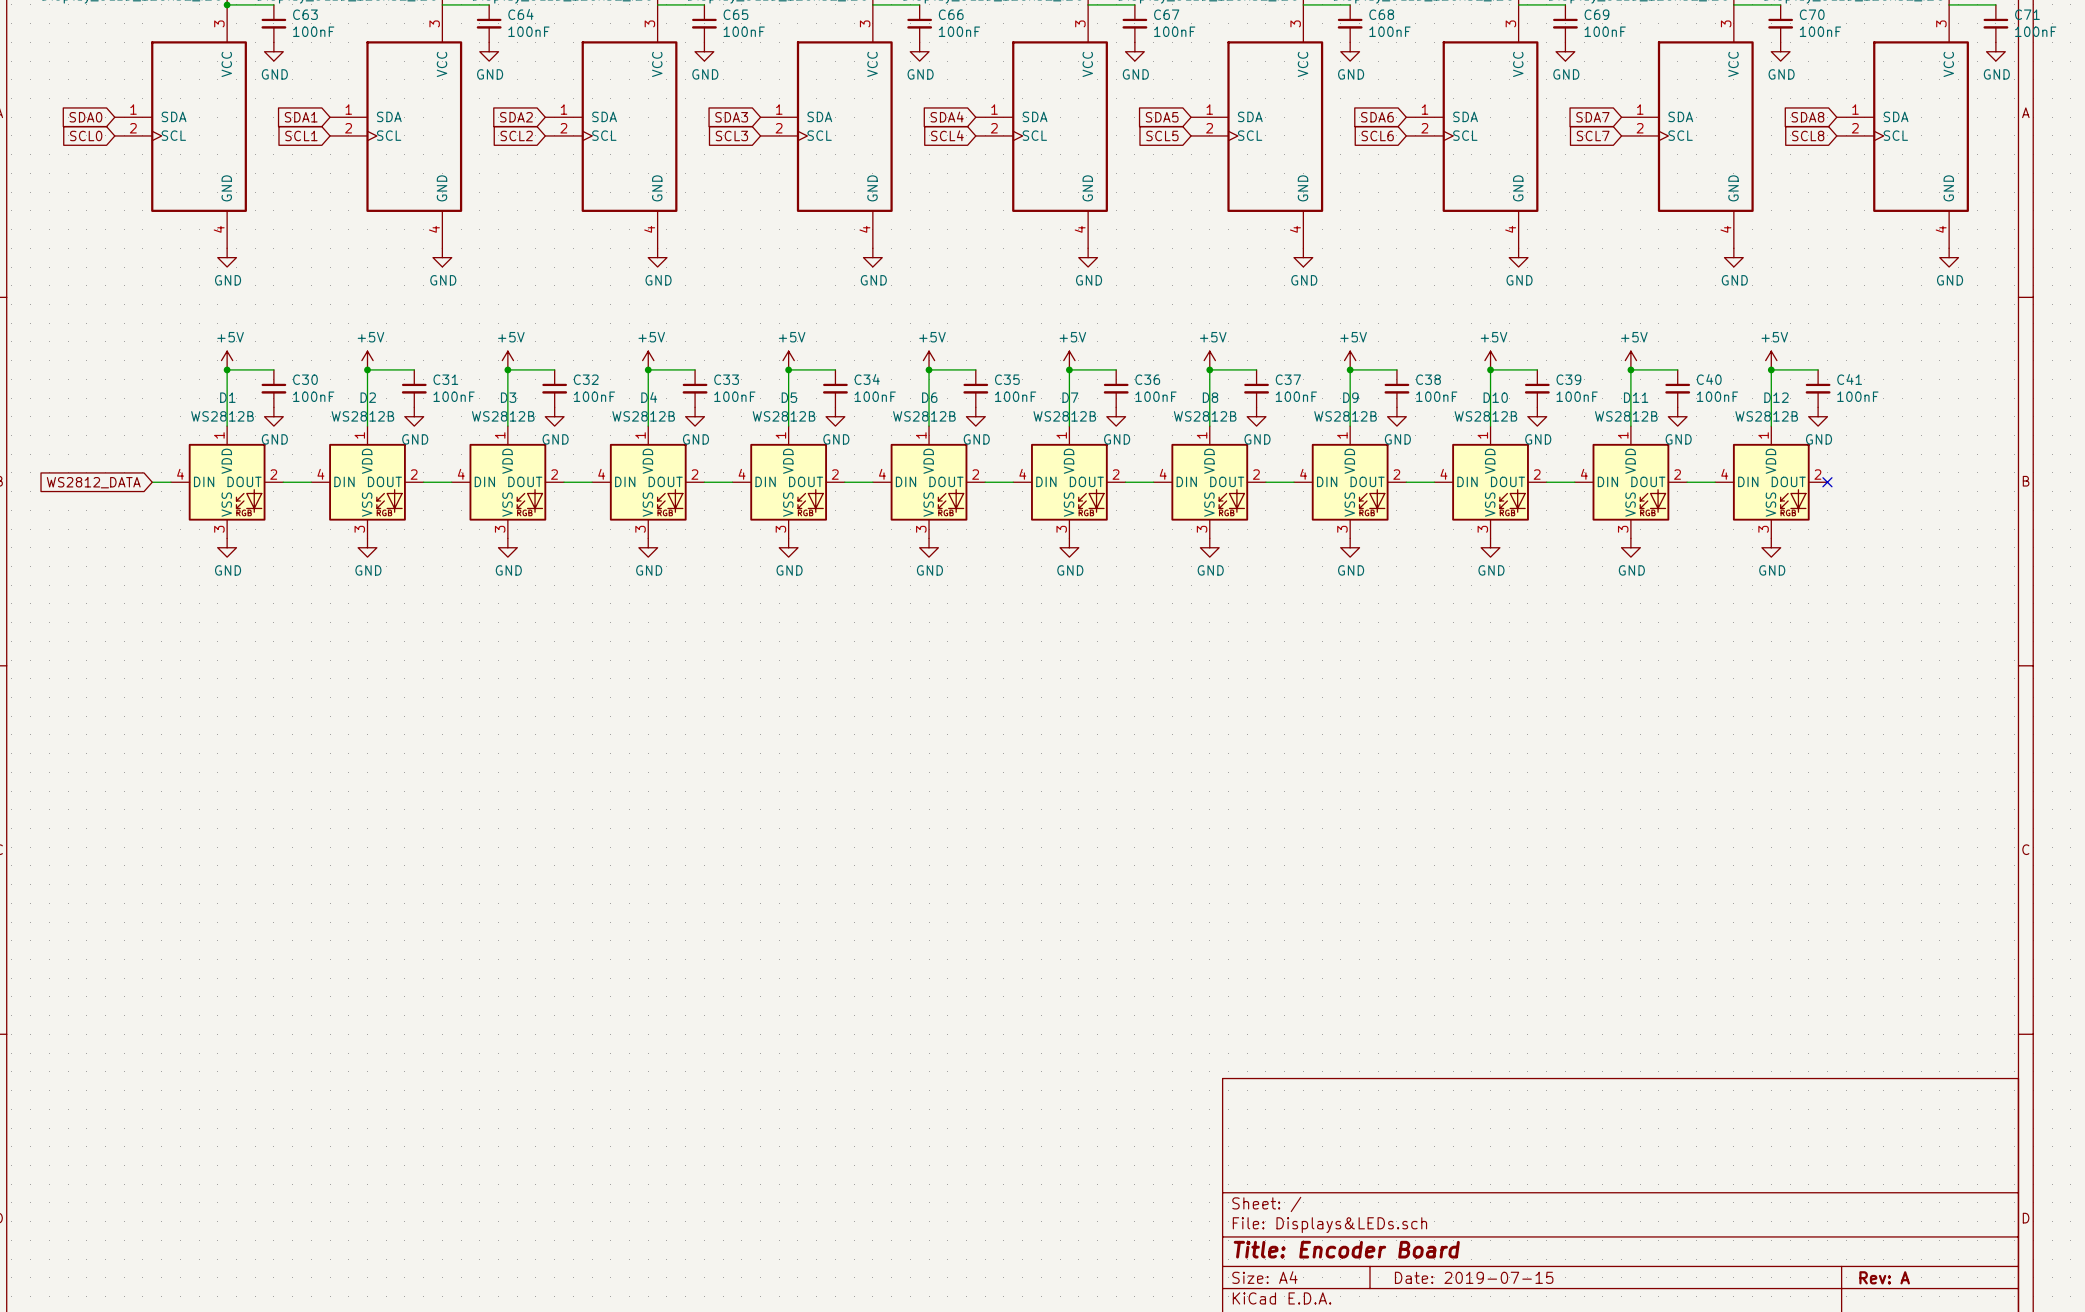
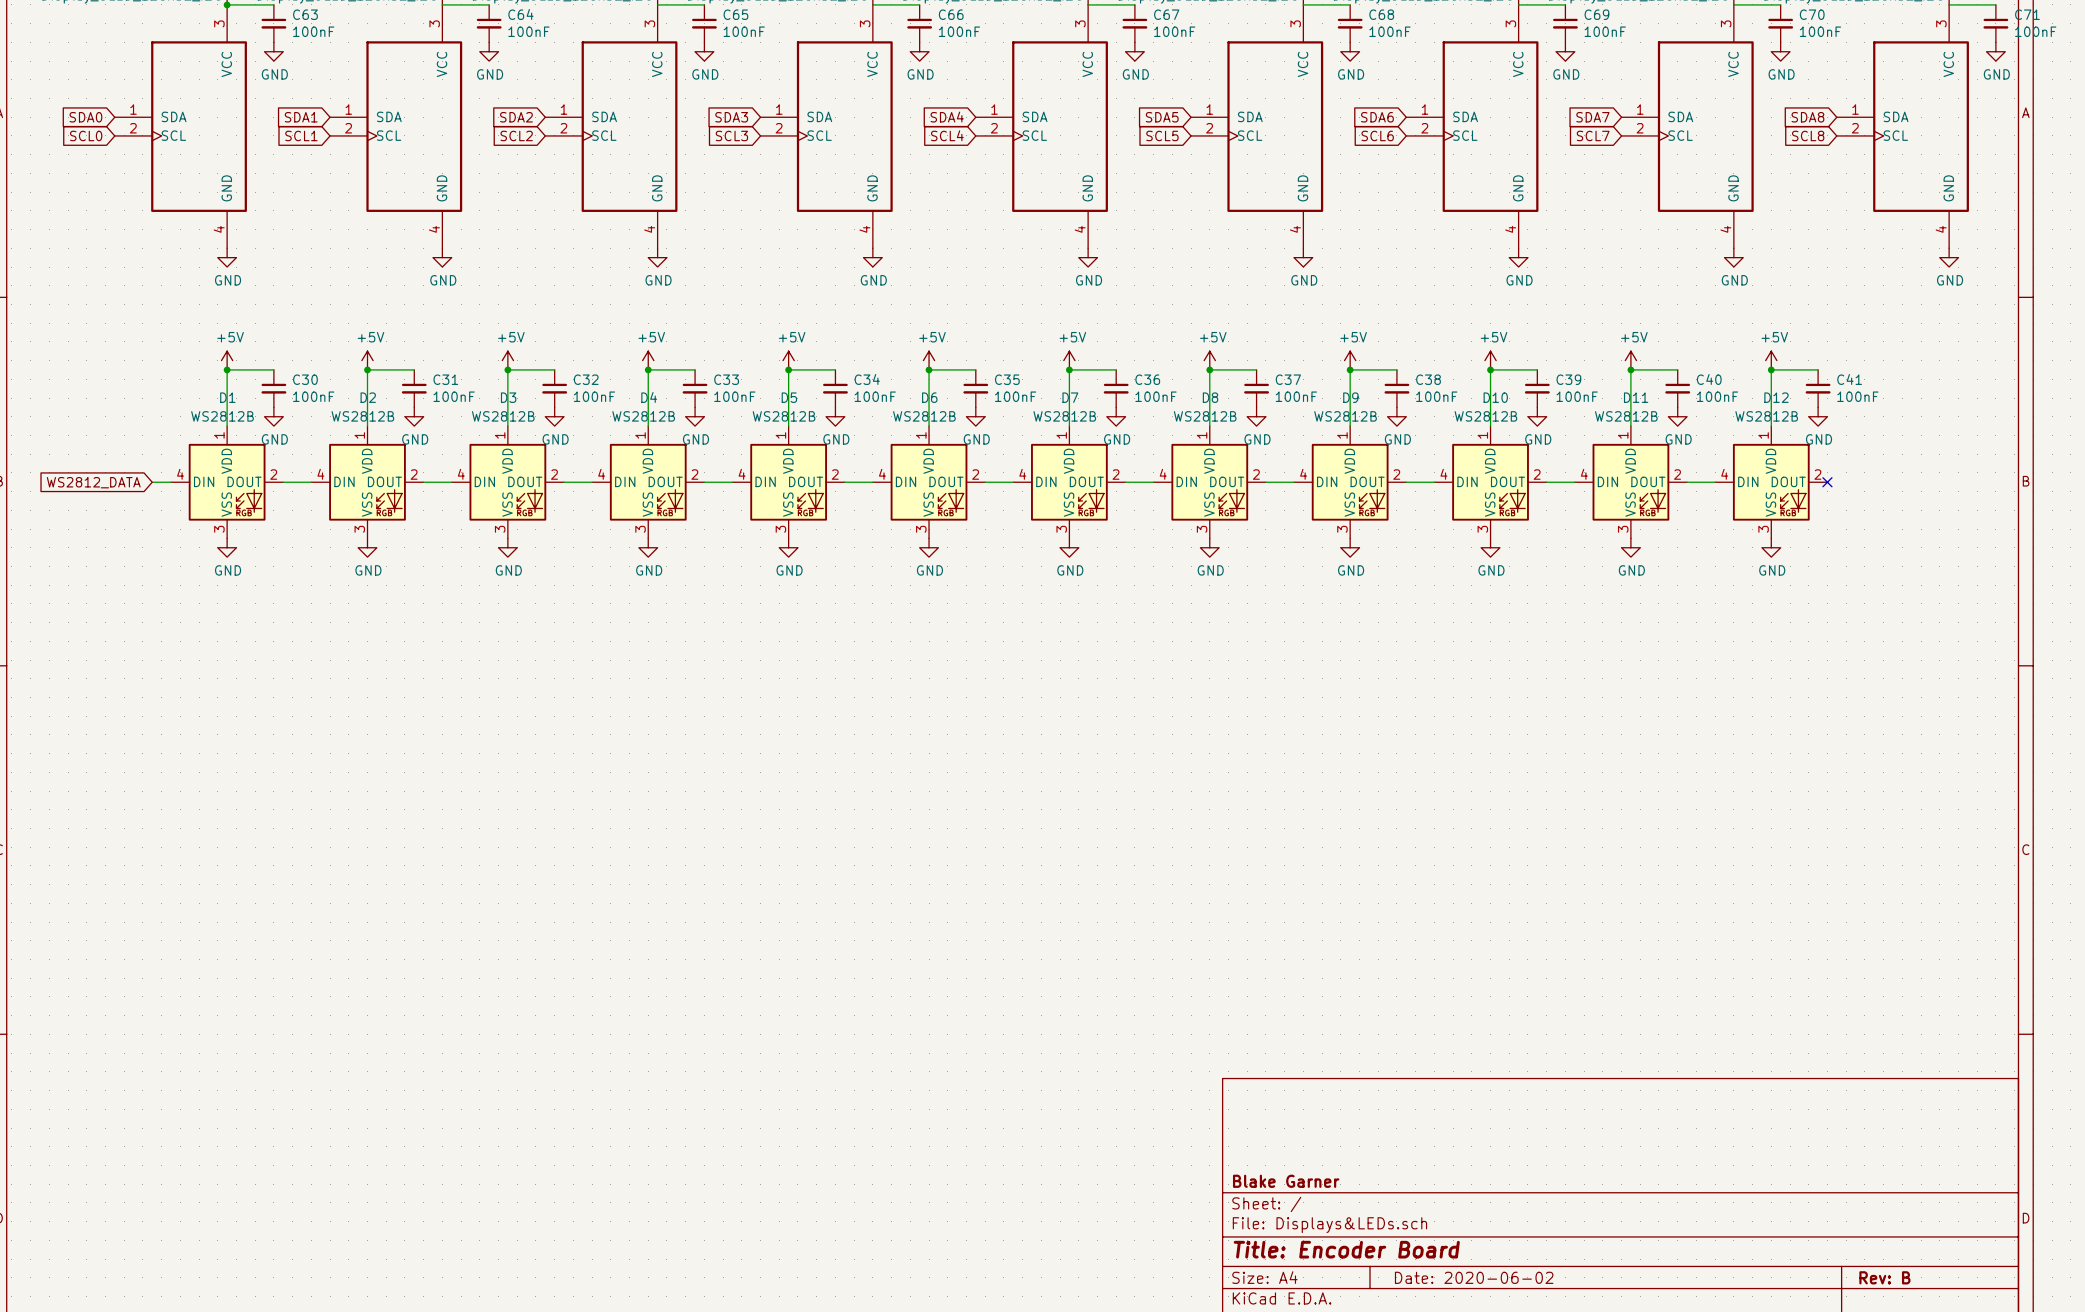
title block: none -> Blake Garner (1286, 1181)
title block: Date: 2019-07-15 (1474, 1277) -> Date: 2020-06-02 (1474, 1277)
title block: Rev: A (1884, 1277) -> Rev: B (1884, 1277)

